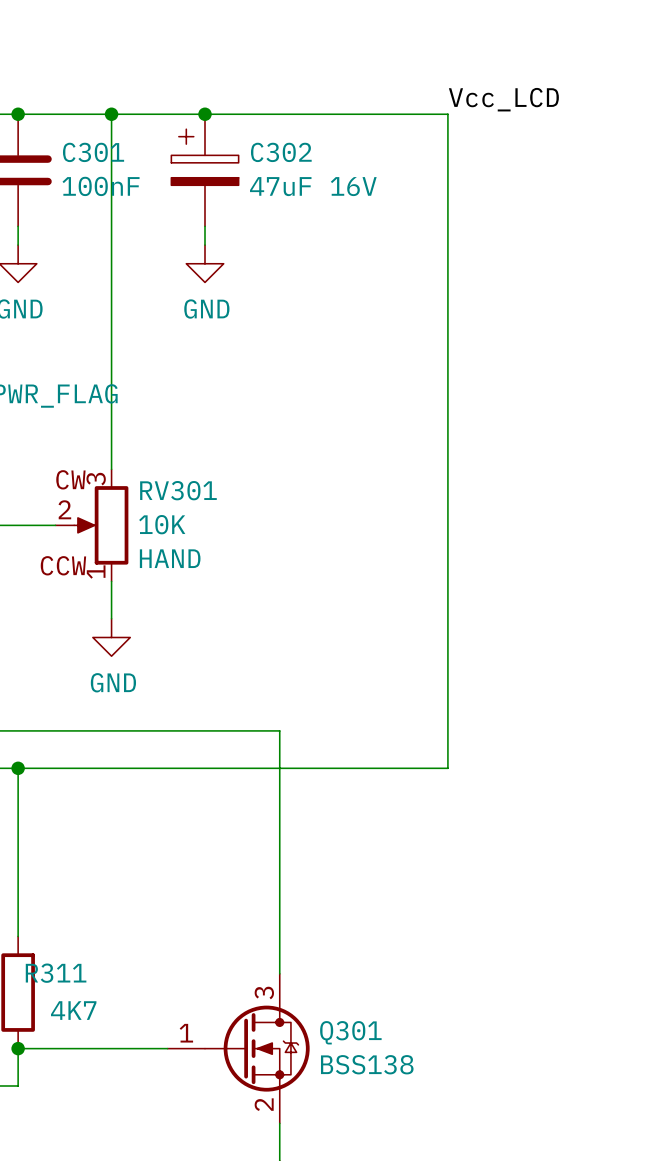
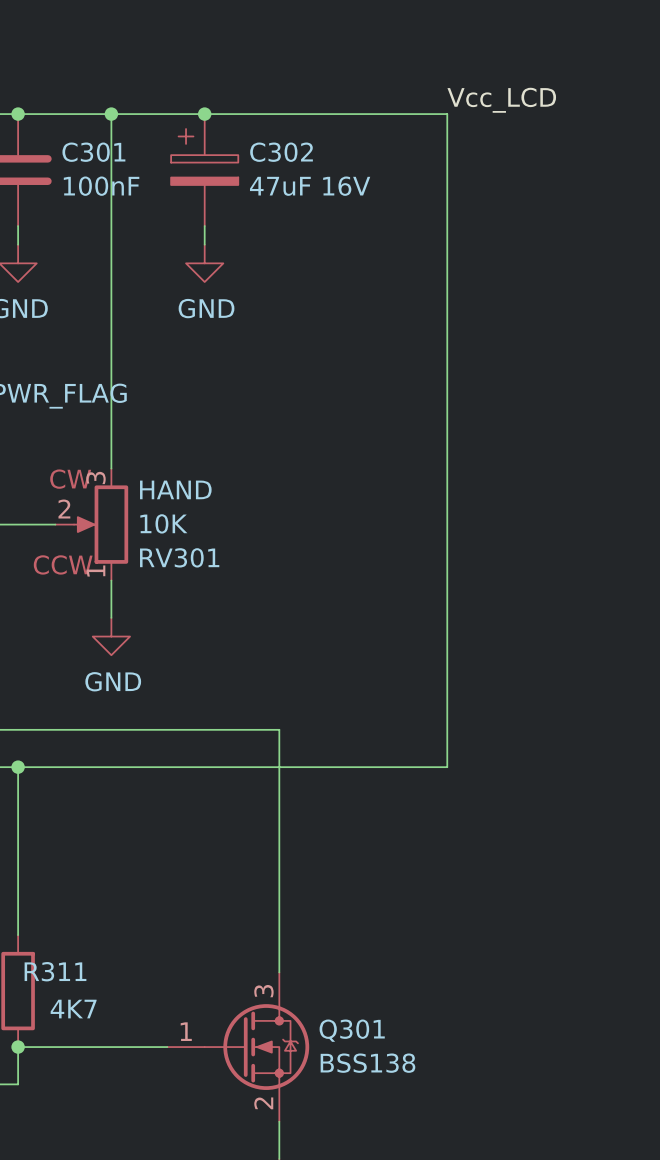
RV301 name position: RV301 (178, 490) -> RV301 (179, 557)
RV301 text position: HAND (170, 558) -> HAND (175, 489)

